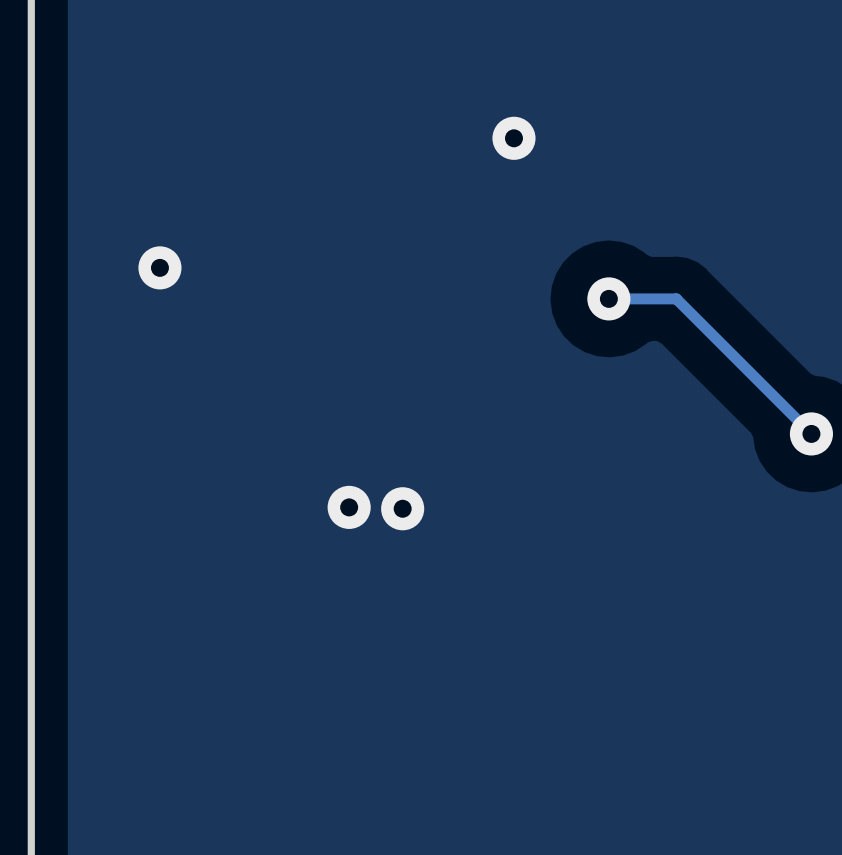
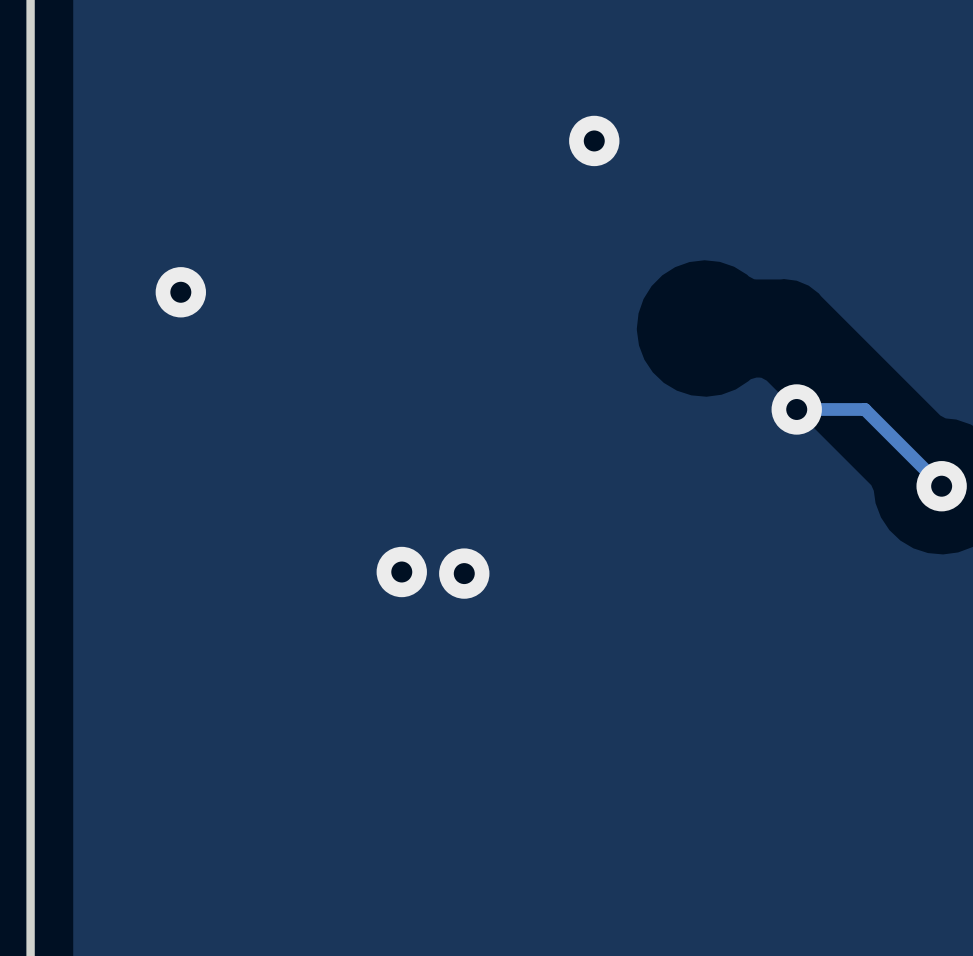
track: (608, 298) (676, 298) (745, 368) -> (796, 409) (864, 409)
via position: (608, 298) -> (796, 409)

